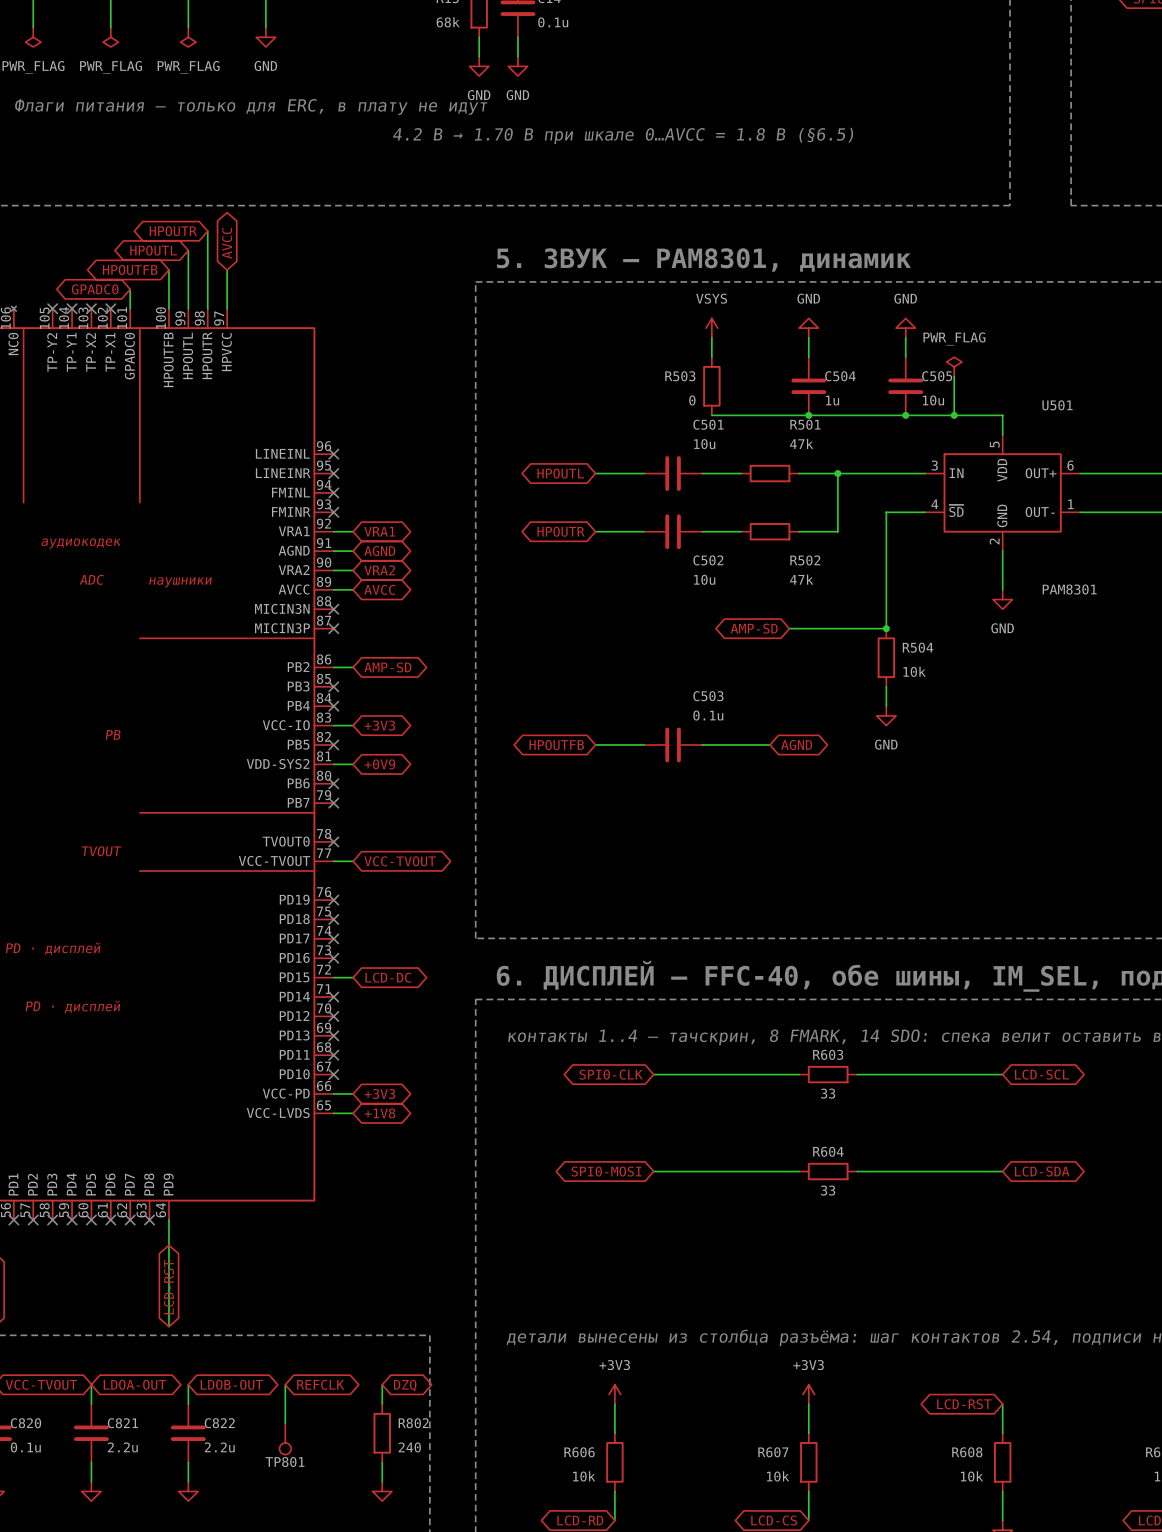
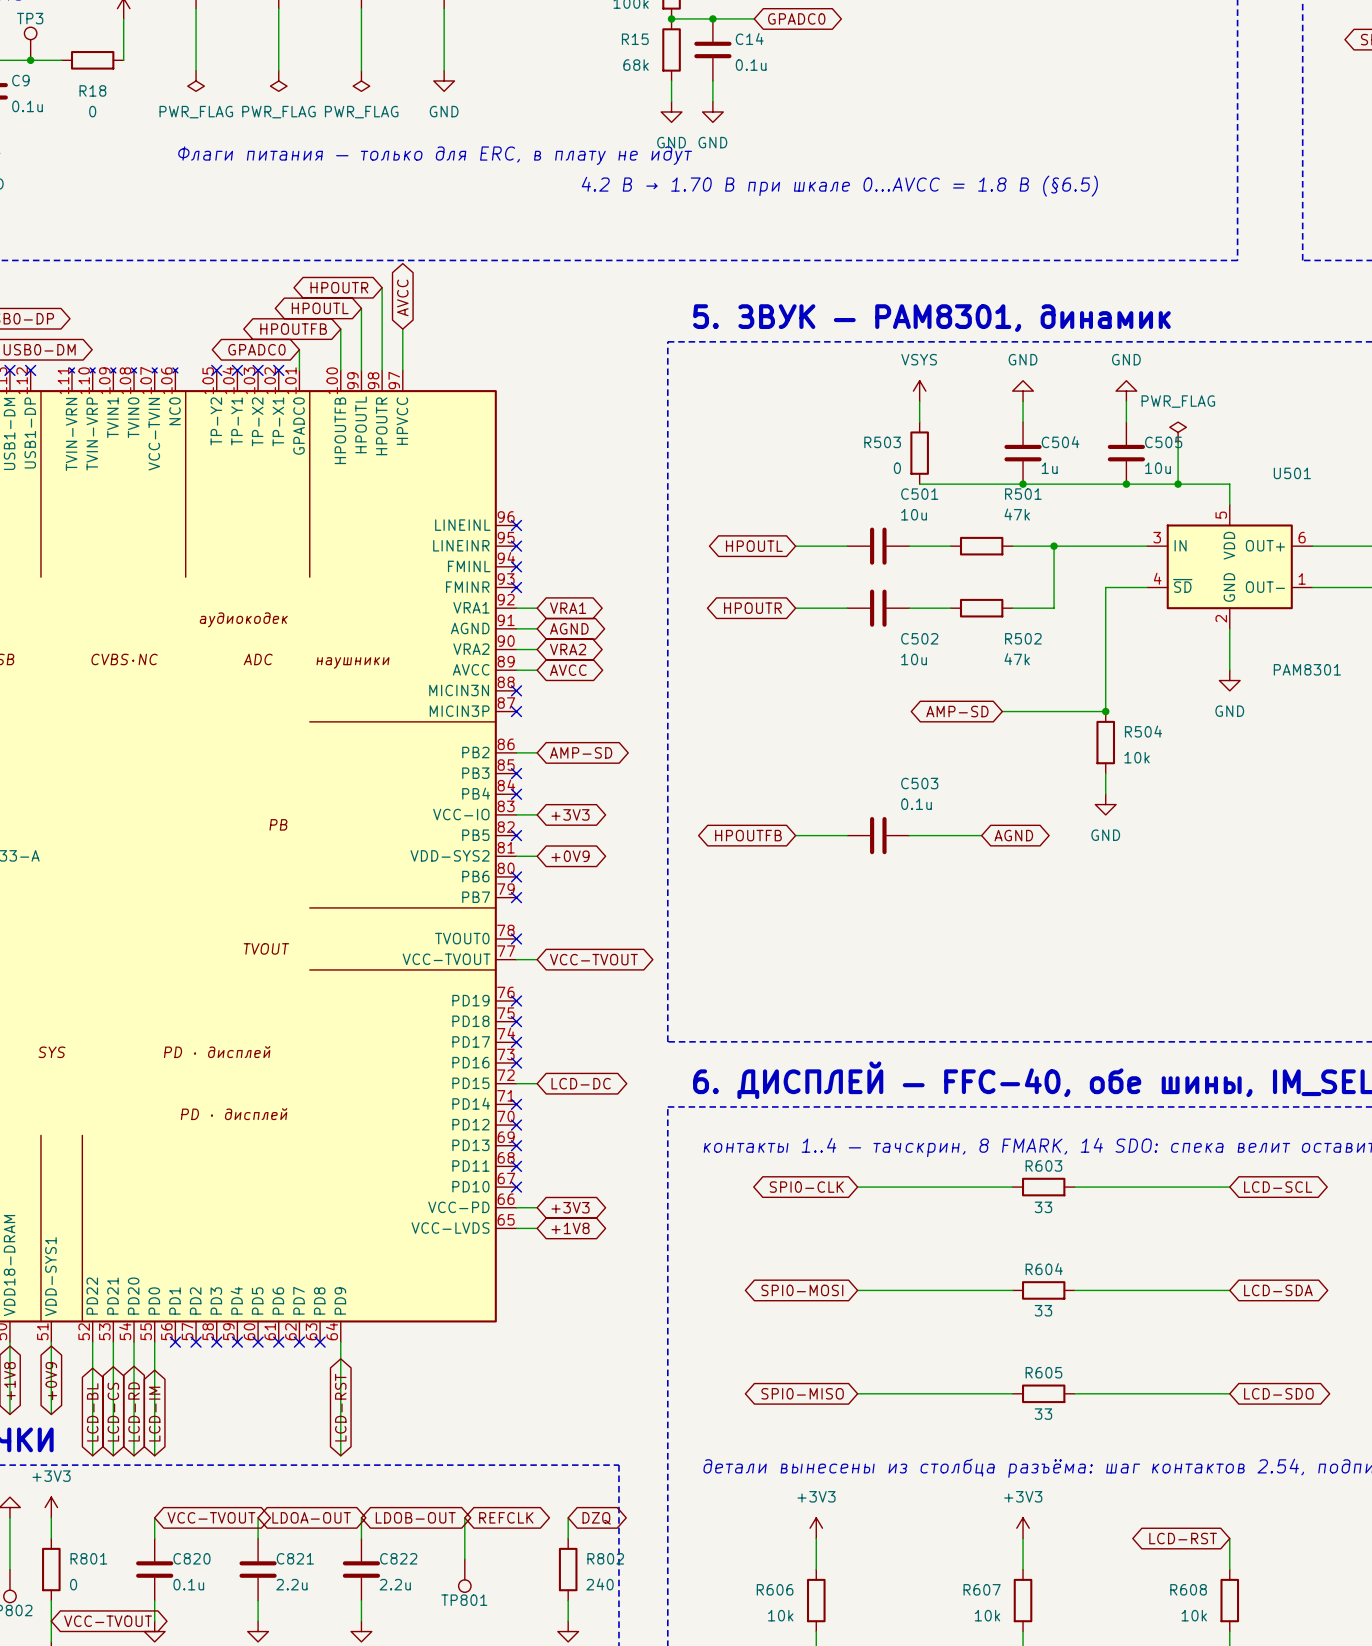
global label: none -> SPI0-MISO (802, 1393)
wire: none -> (857, 1393) (1012, 1393)
R605: none -> 33 (1043, 1393)
wire: none -> (1074, 1393) (1229, 1393)
global label: none -> LCD-SDO (1278, 1393)

